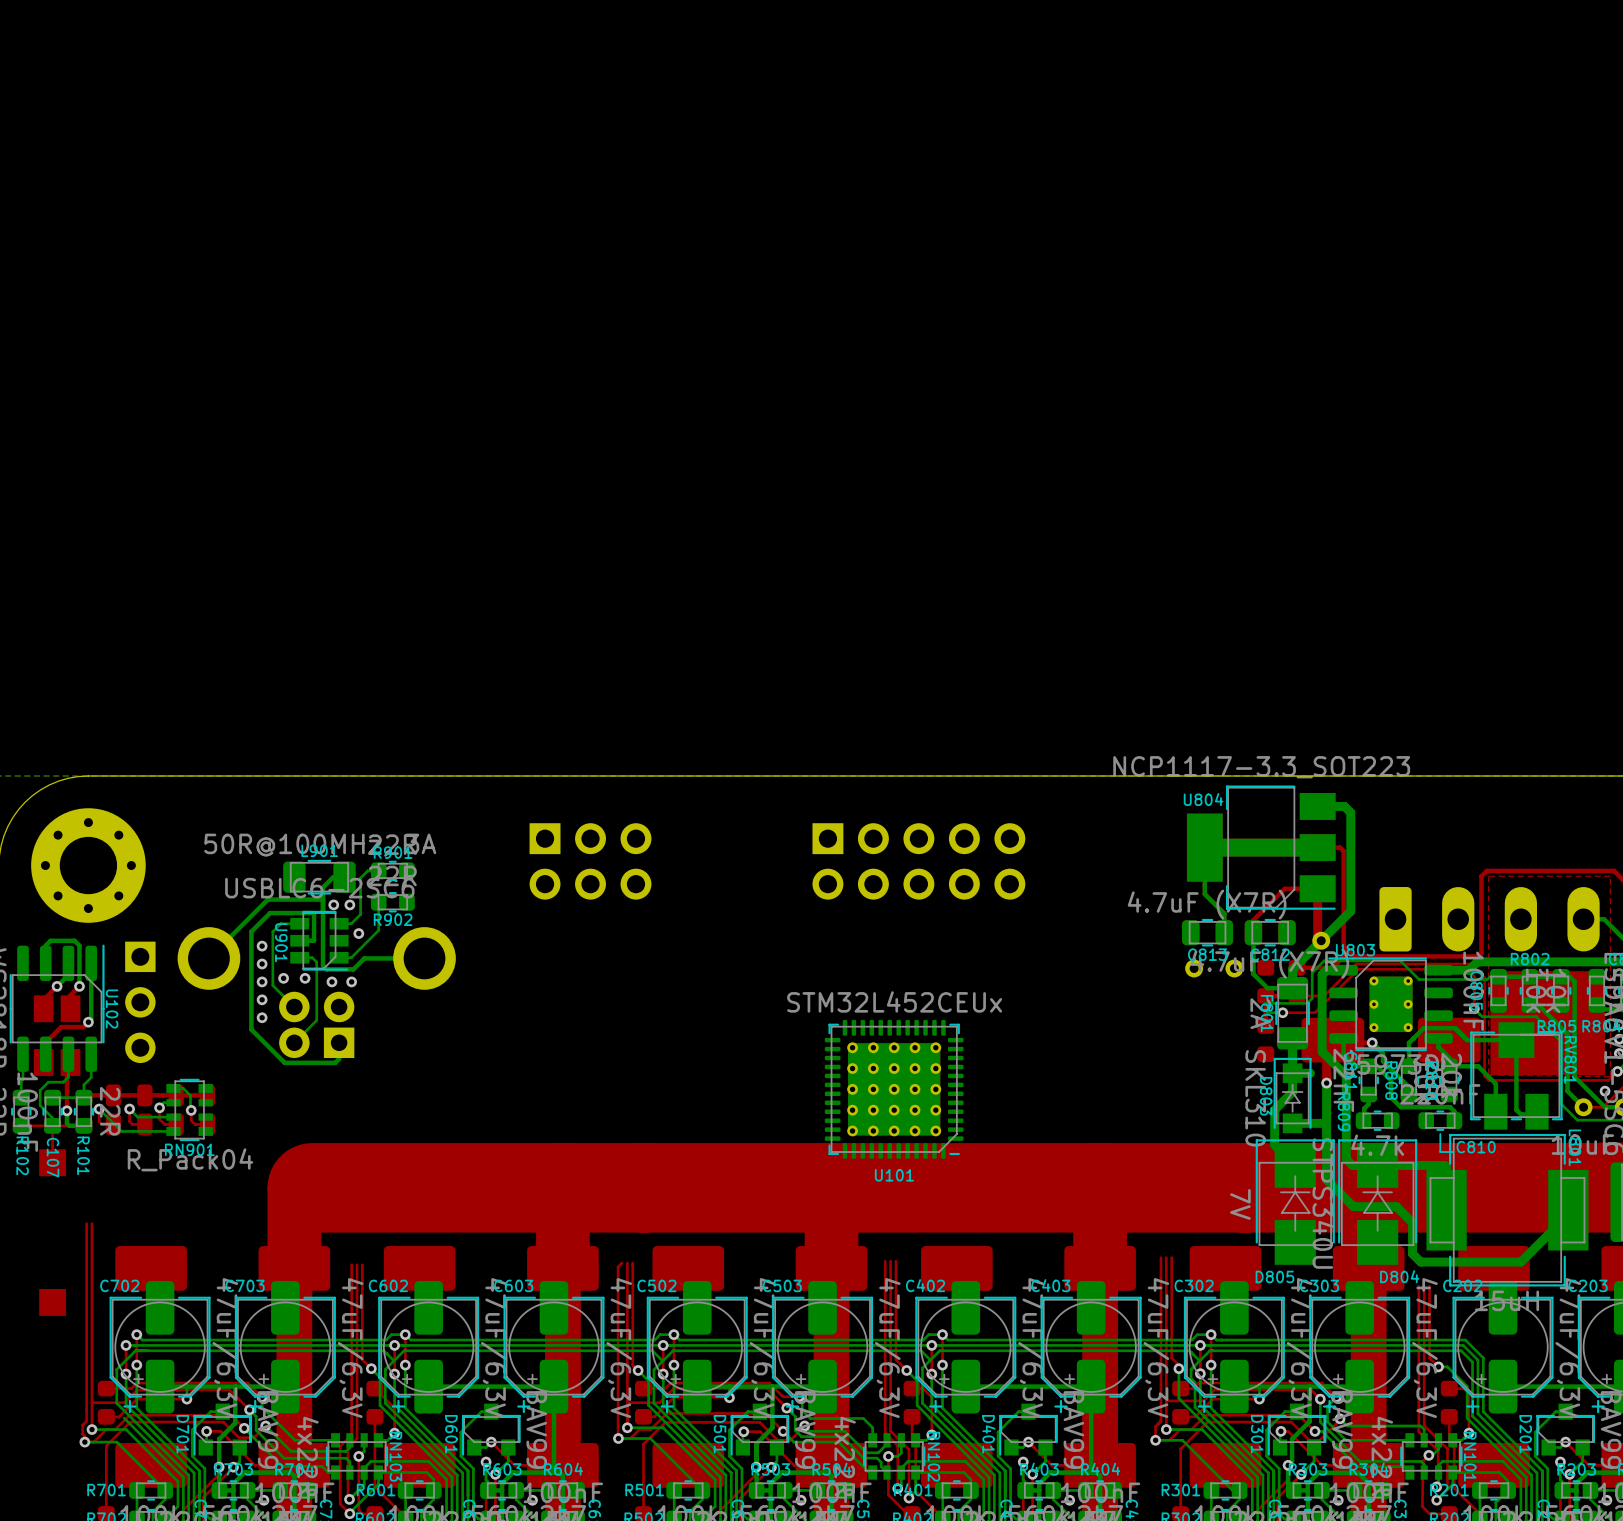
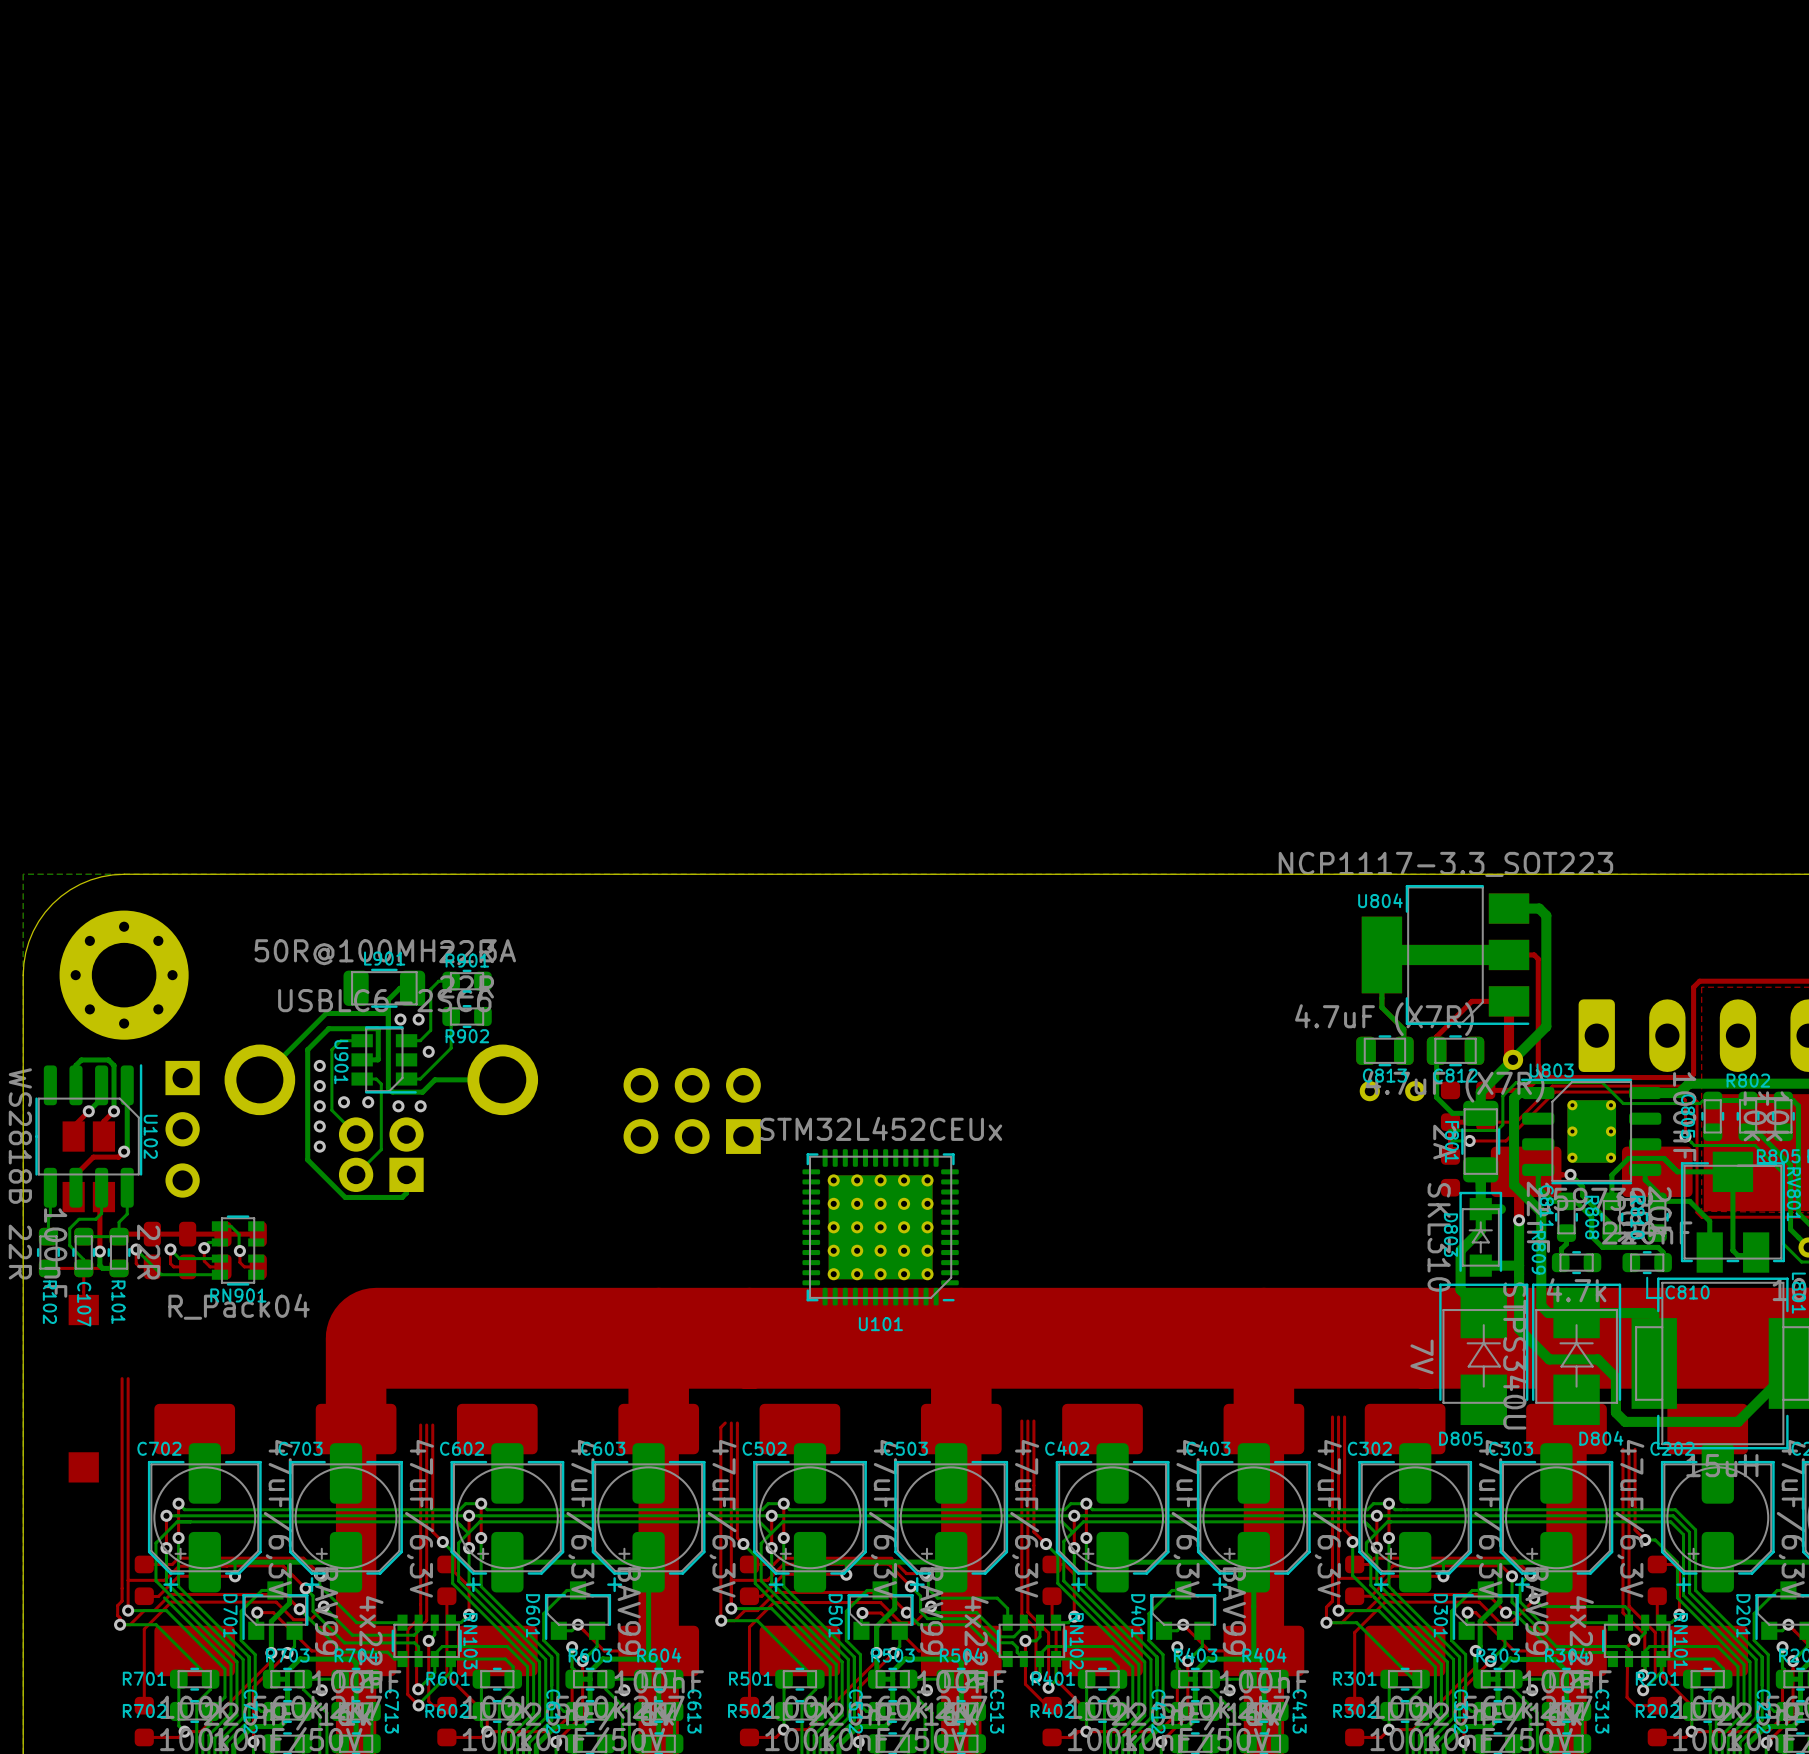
part rotation: 0° (590, 861) -> 180° (692, 1110)
part position: (590, 861) -> (692, 1110)
part: (918, 861) -> none
U101 position: (894, 1089) -> (880, 1227)

